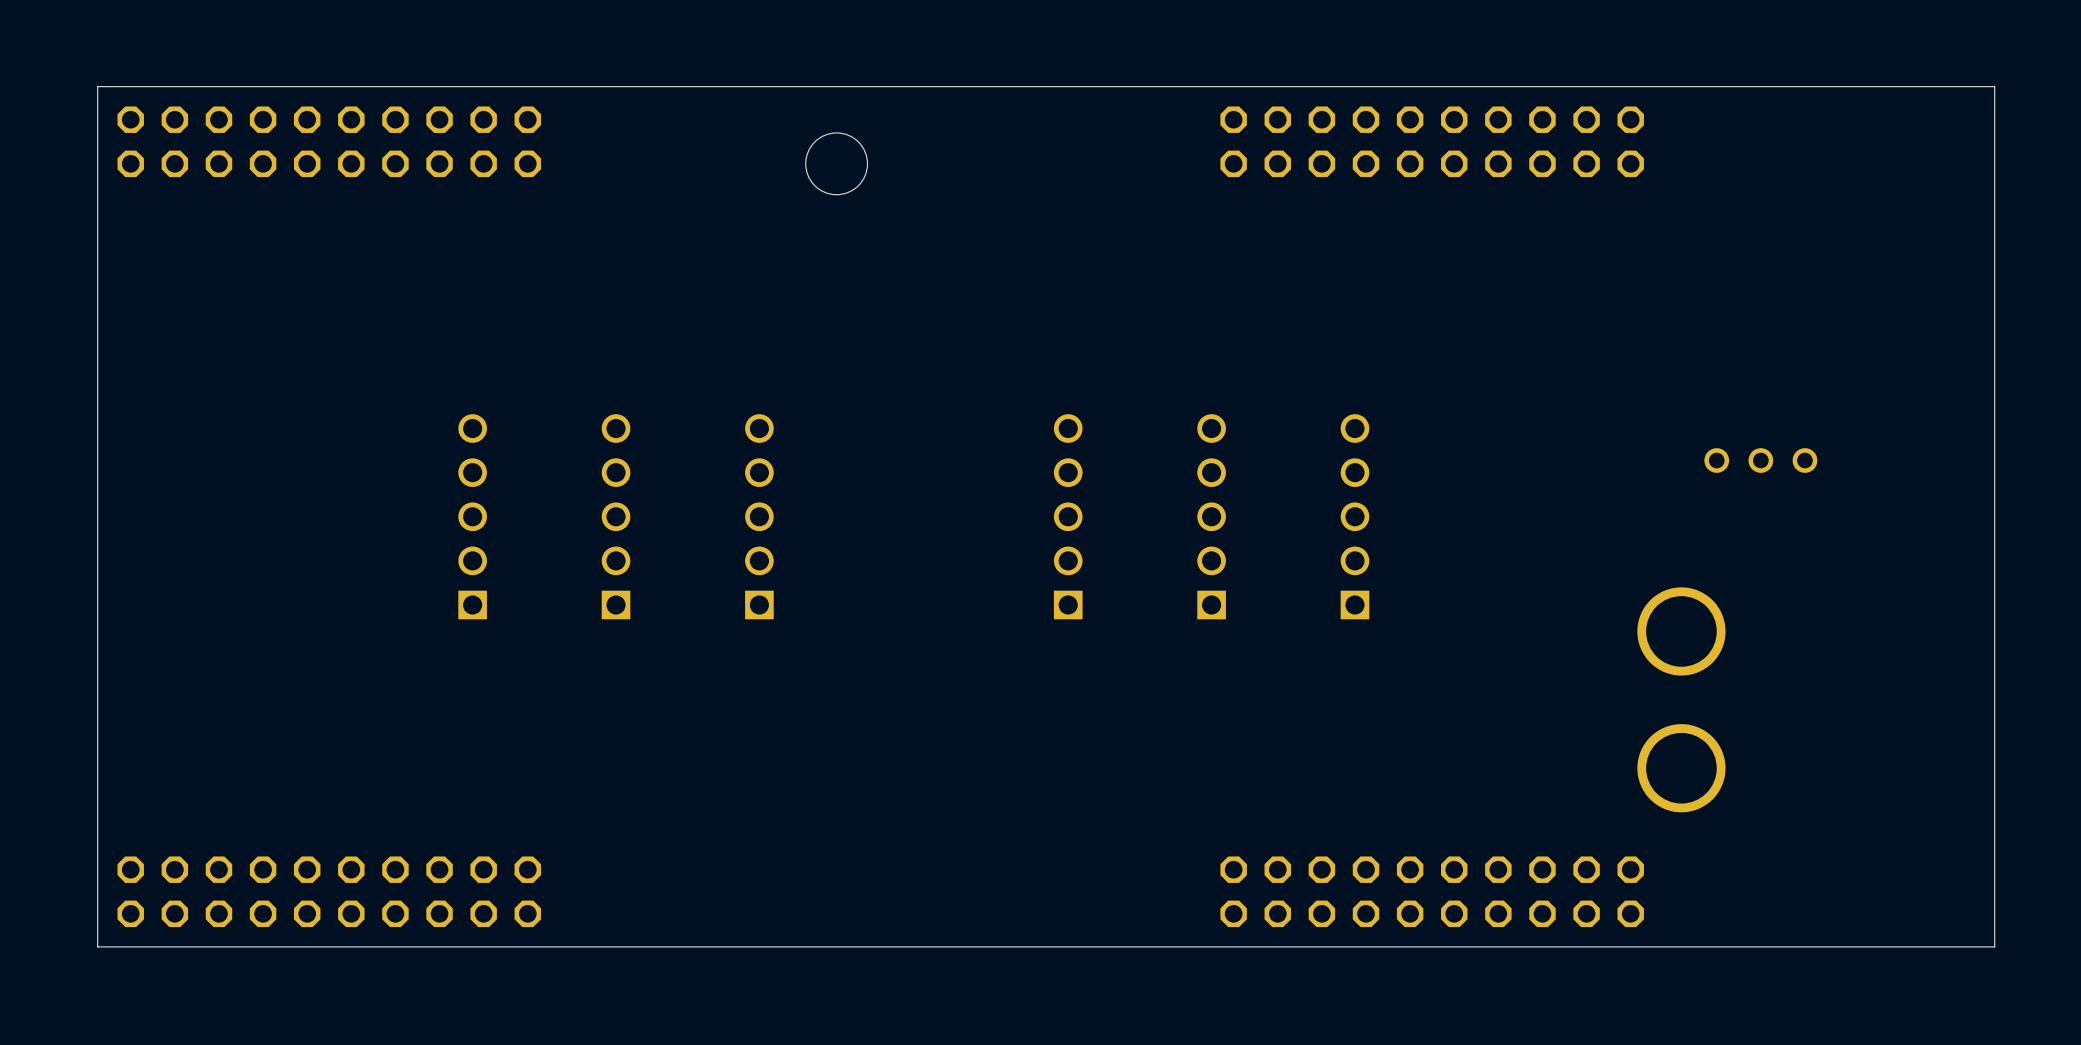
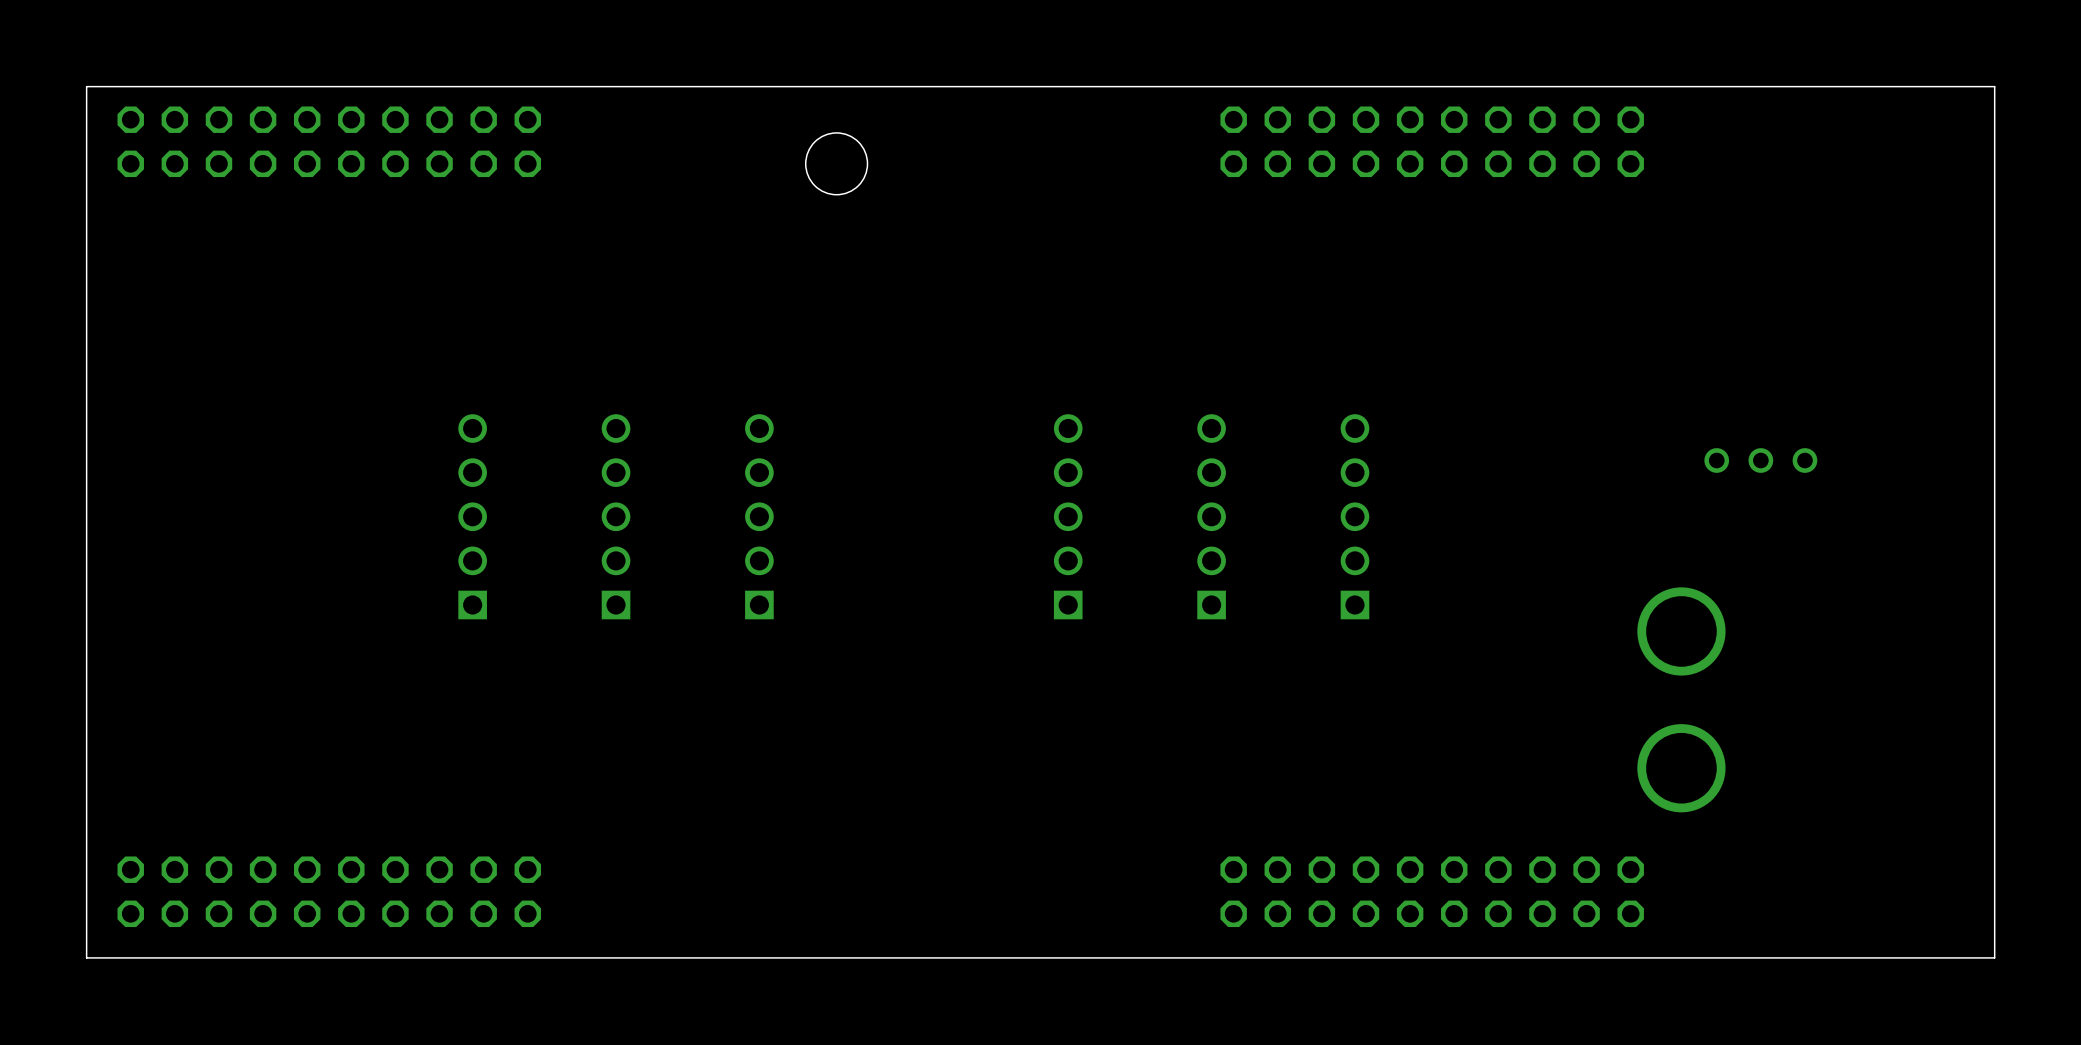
board edge: (97, 86) (97, 946) (1994, 946) -> (97, 86) (86, 86) (86, 957) (1994, 957) (1994, 946)

